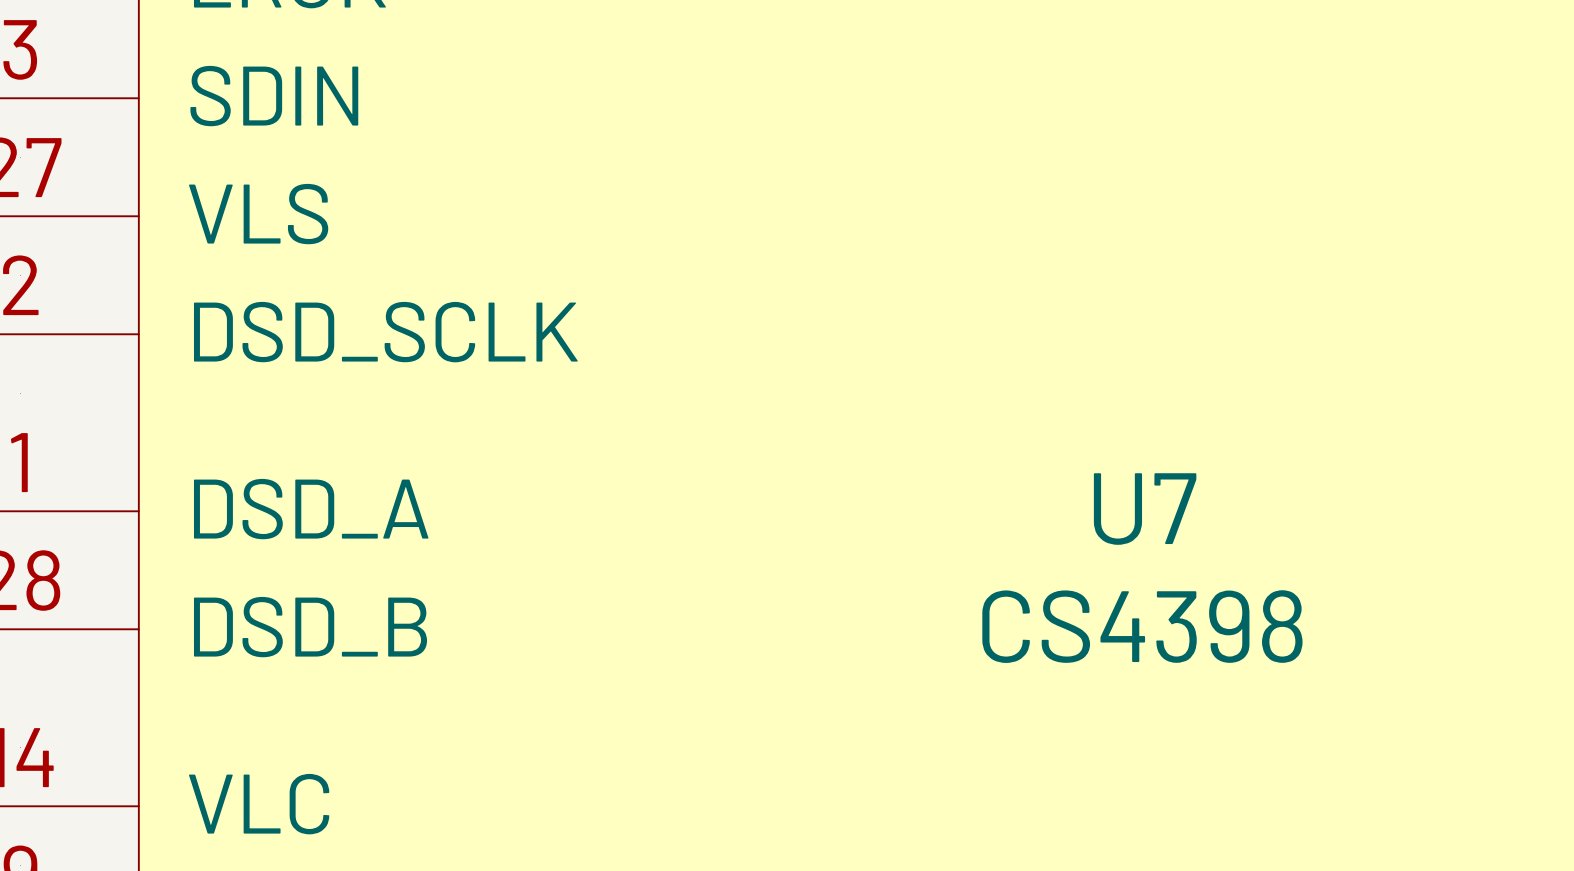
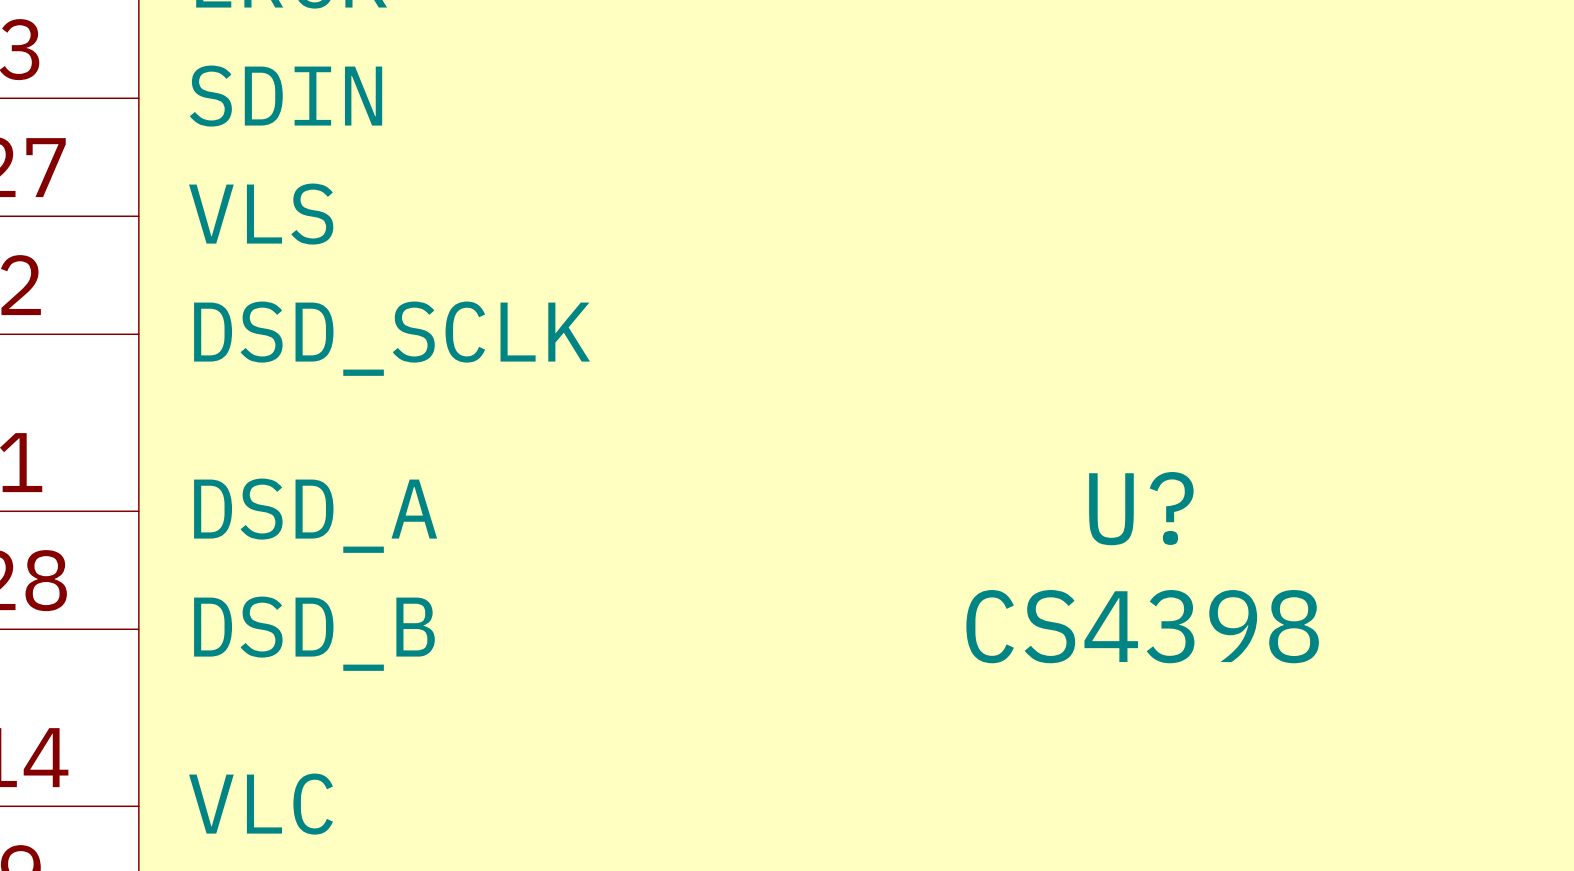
U7 name: U7 (1145, 509) -> U? (1141, 508)

